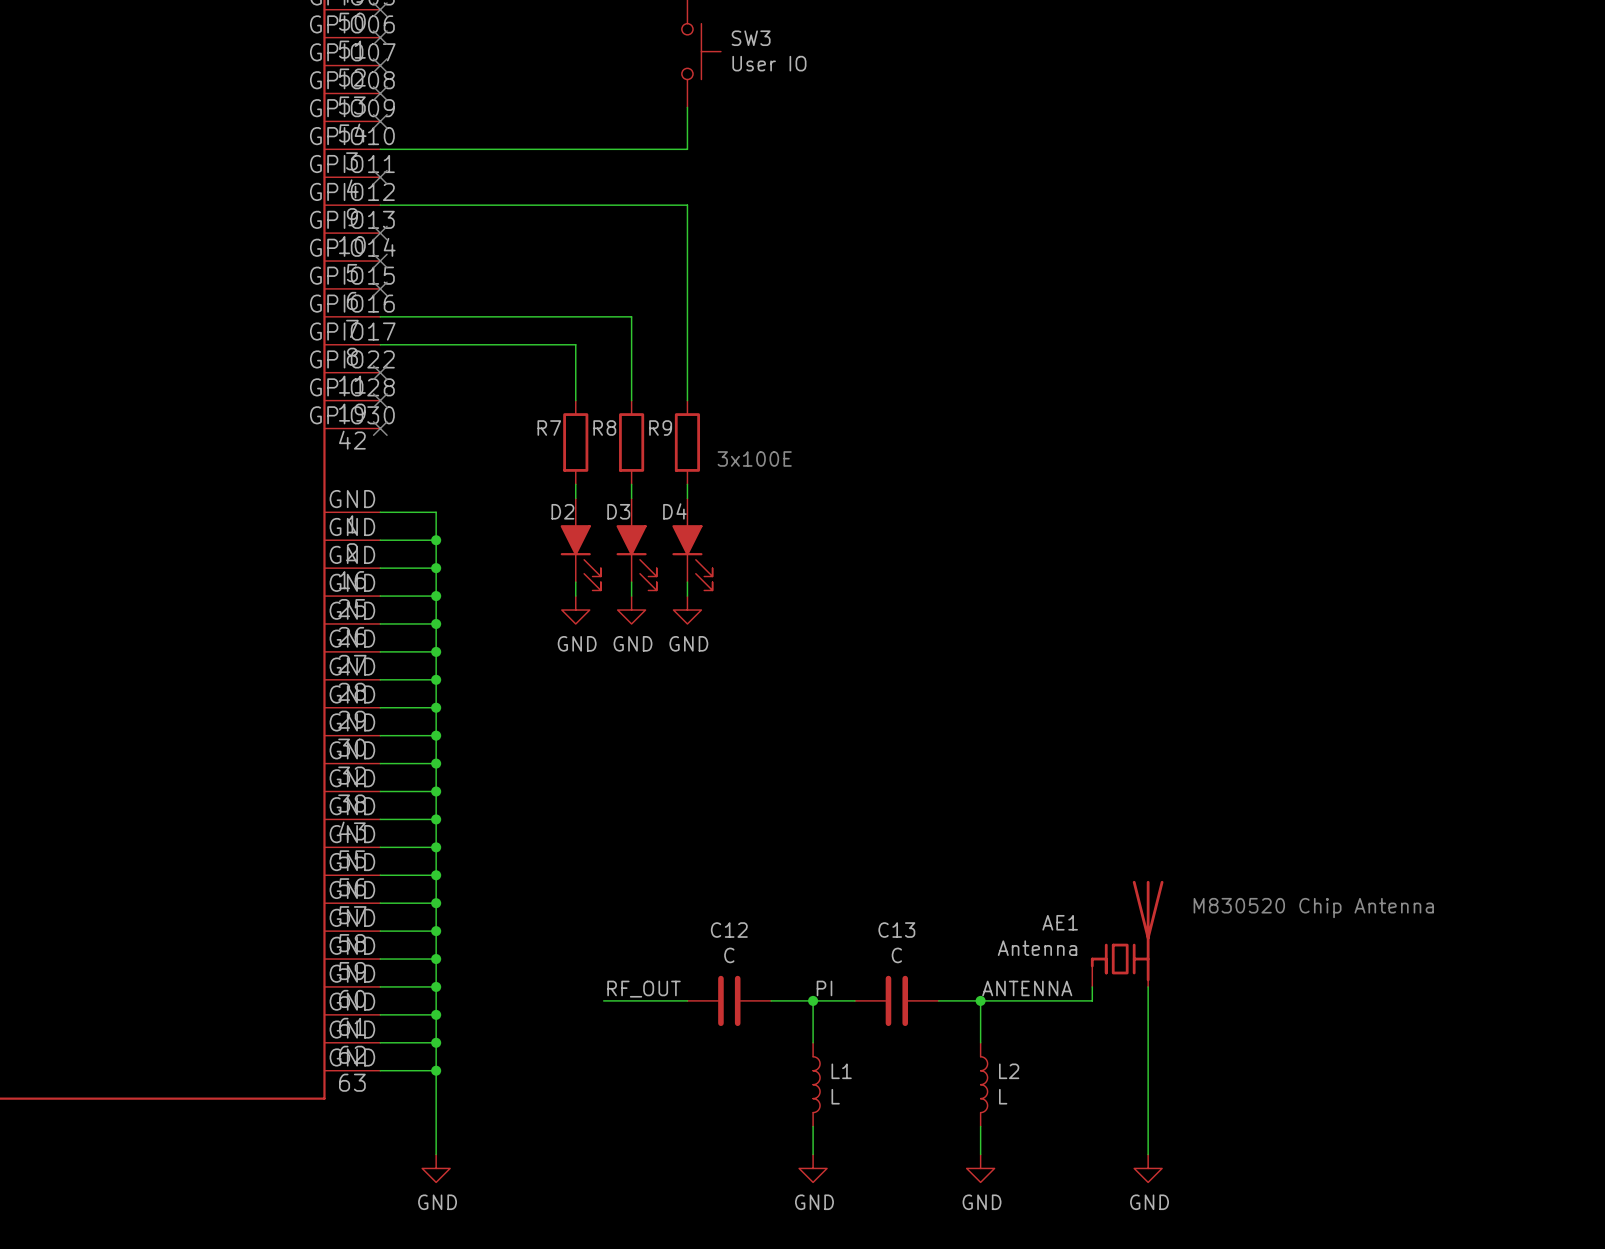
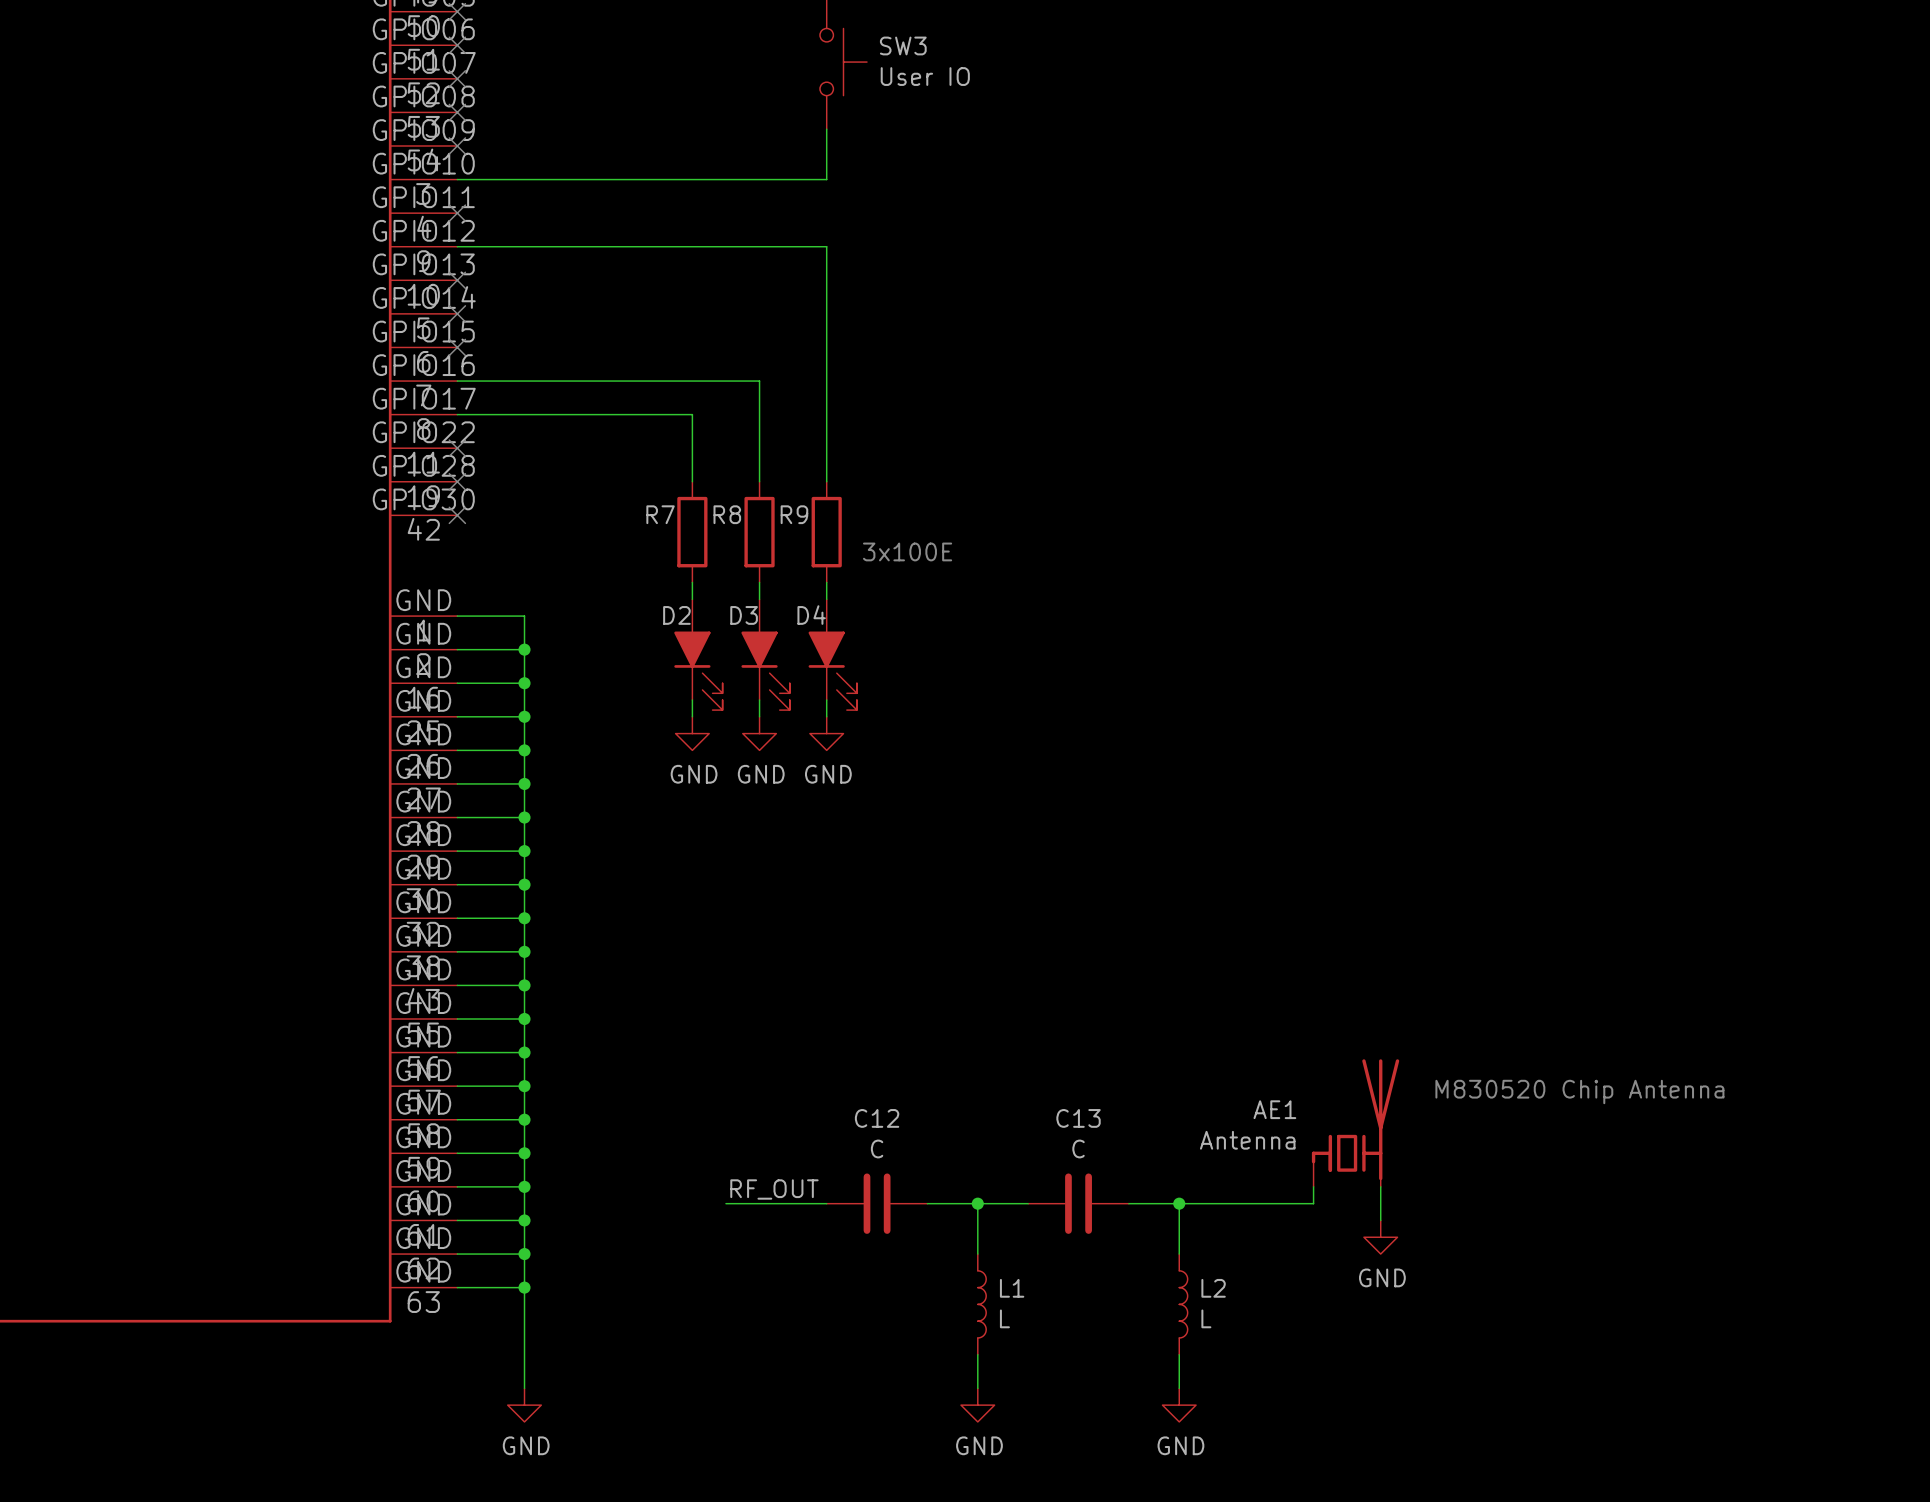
label: PI (824, 988) -> none
label: ANTENNA (1027, 988) -> none
wire: (1148, 1014) (1148, 1154) -> none
power symbol position: GND (1148, 1168) -> GND (1380, 1237)

